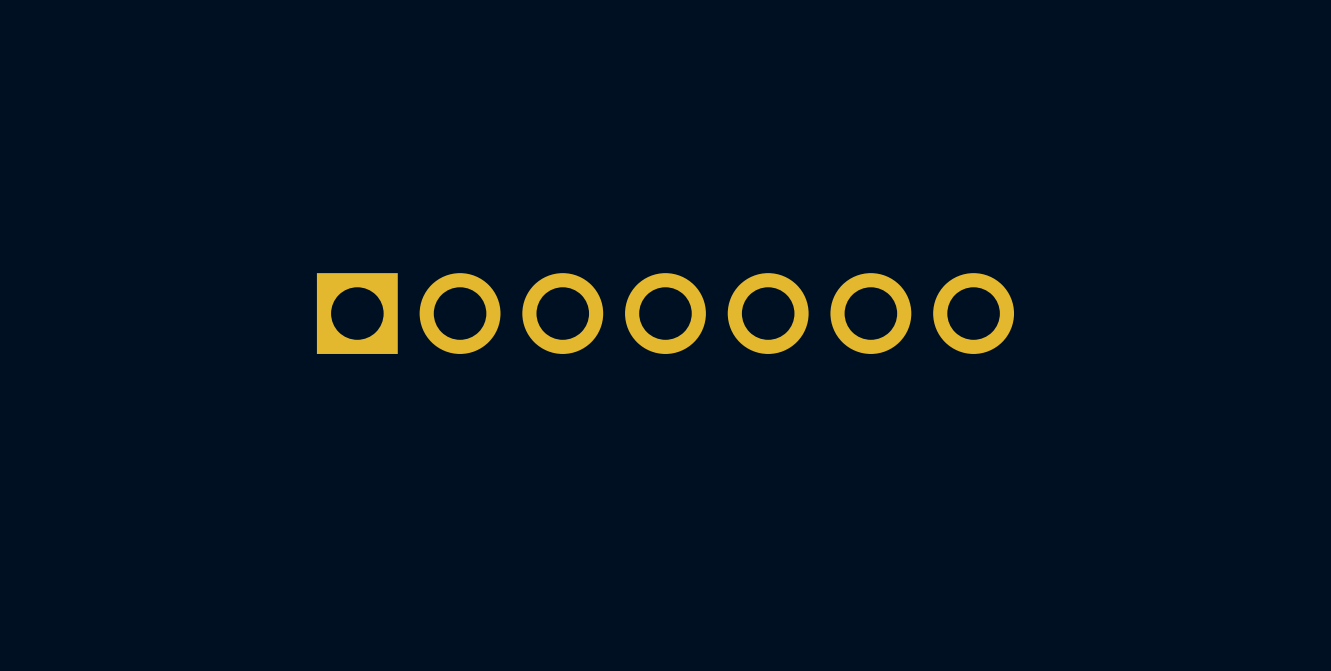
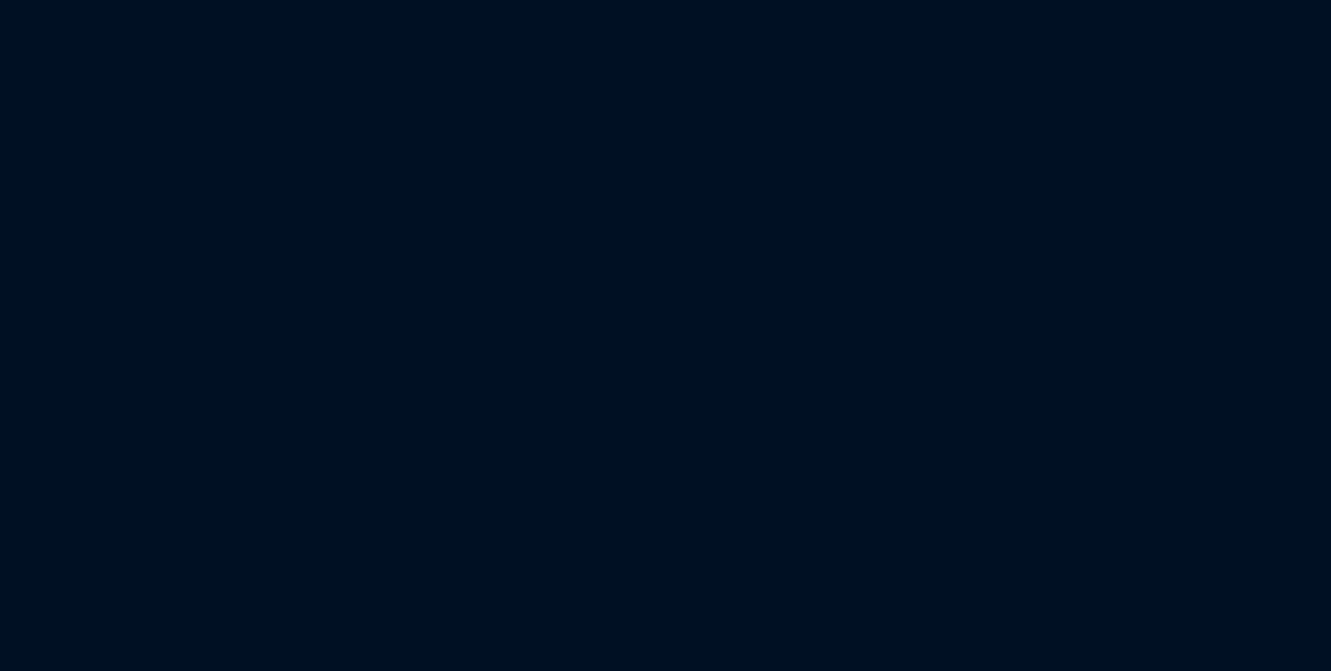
part: (665, 313) -> none

